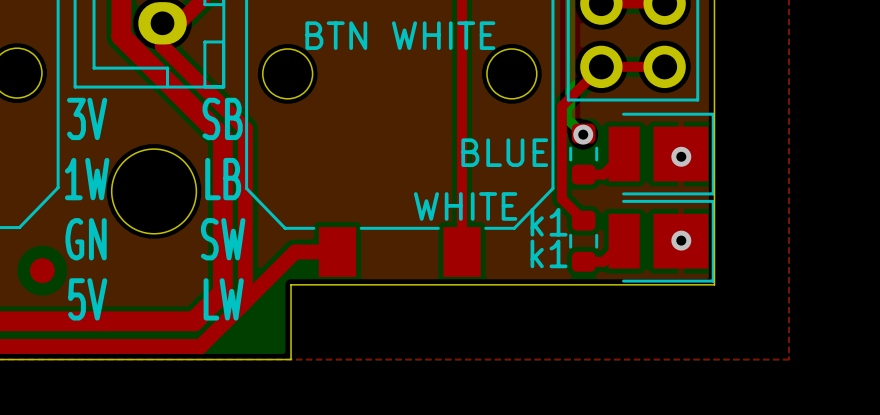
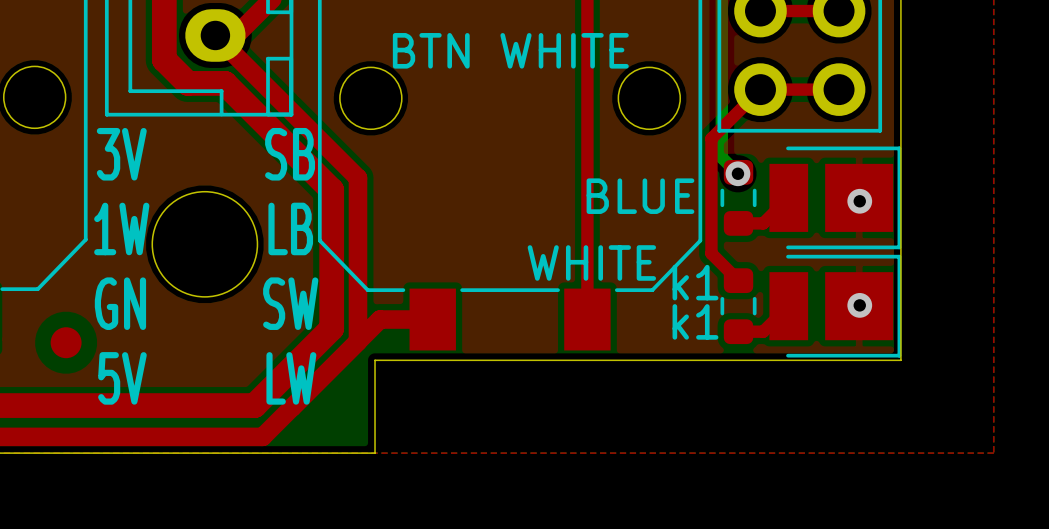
top track: (162, 23) (162, 46) (245, 128) (245, 301) -> (215, 35) (358, 178) (358, 341)
top track: (121, 36) (222, 137) (222, 292) -> (164, 51) (164, 59) (187, 83) (224, 83) (331, 190) (331, 328) (290, 369)

